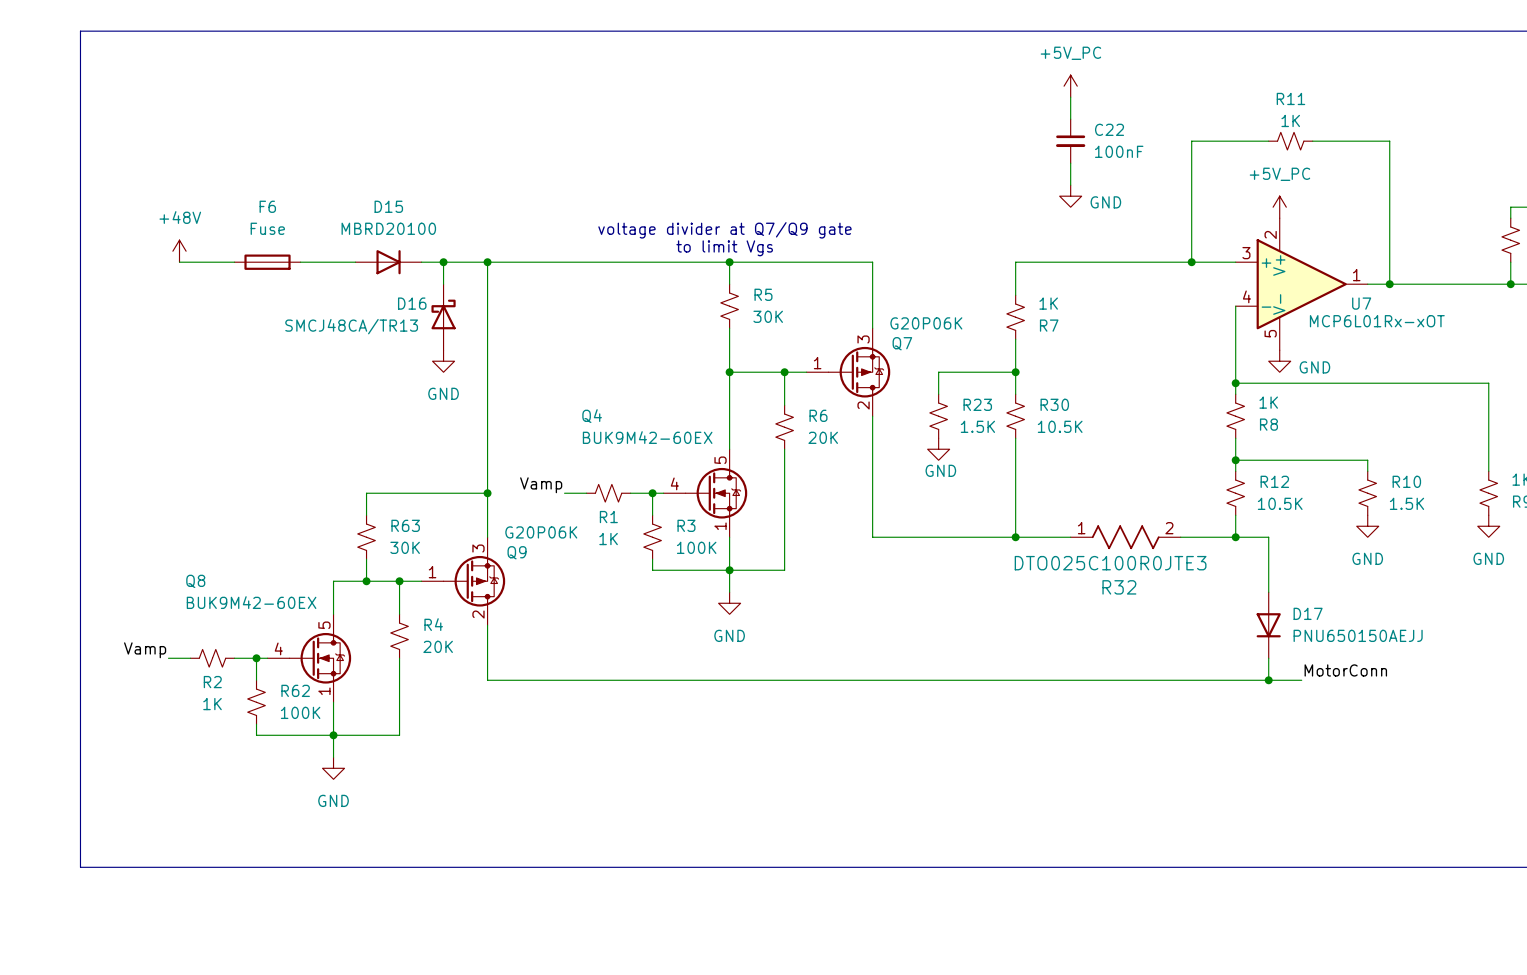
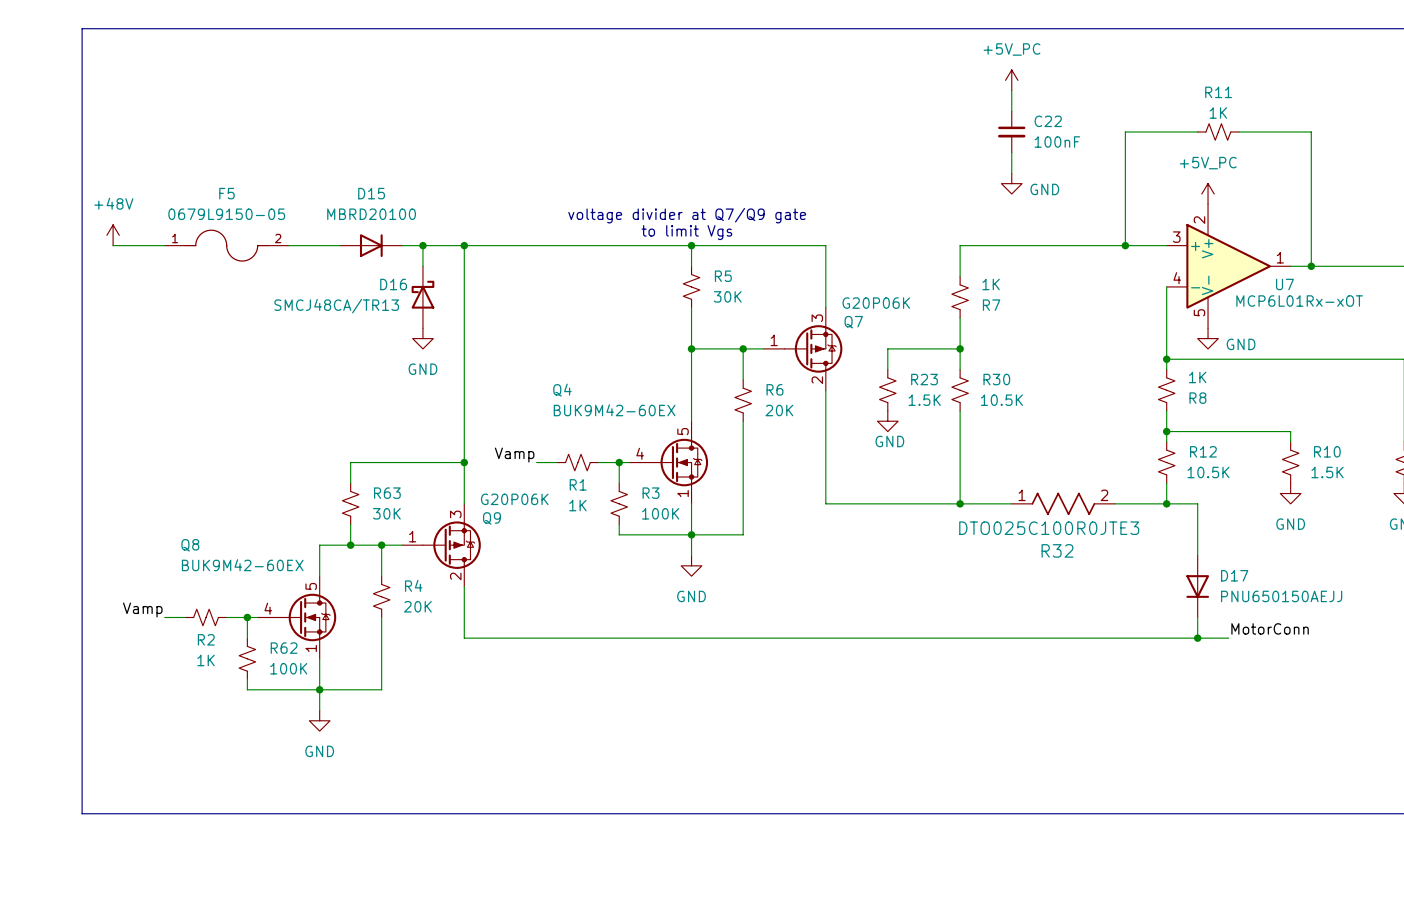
power symbol position: +48V (179, 251) -> +48V (113, 235)
wire: (179, 262) (234, 262) -> (113, 245) (164, 245)
F5: none -> 0679L9150-05 (226, 245)
F6: Fuse (267, 262) -> none

